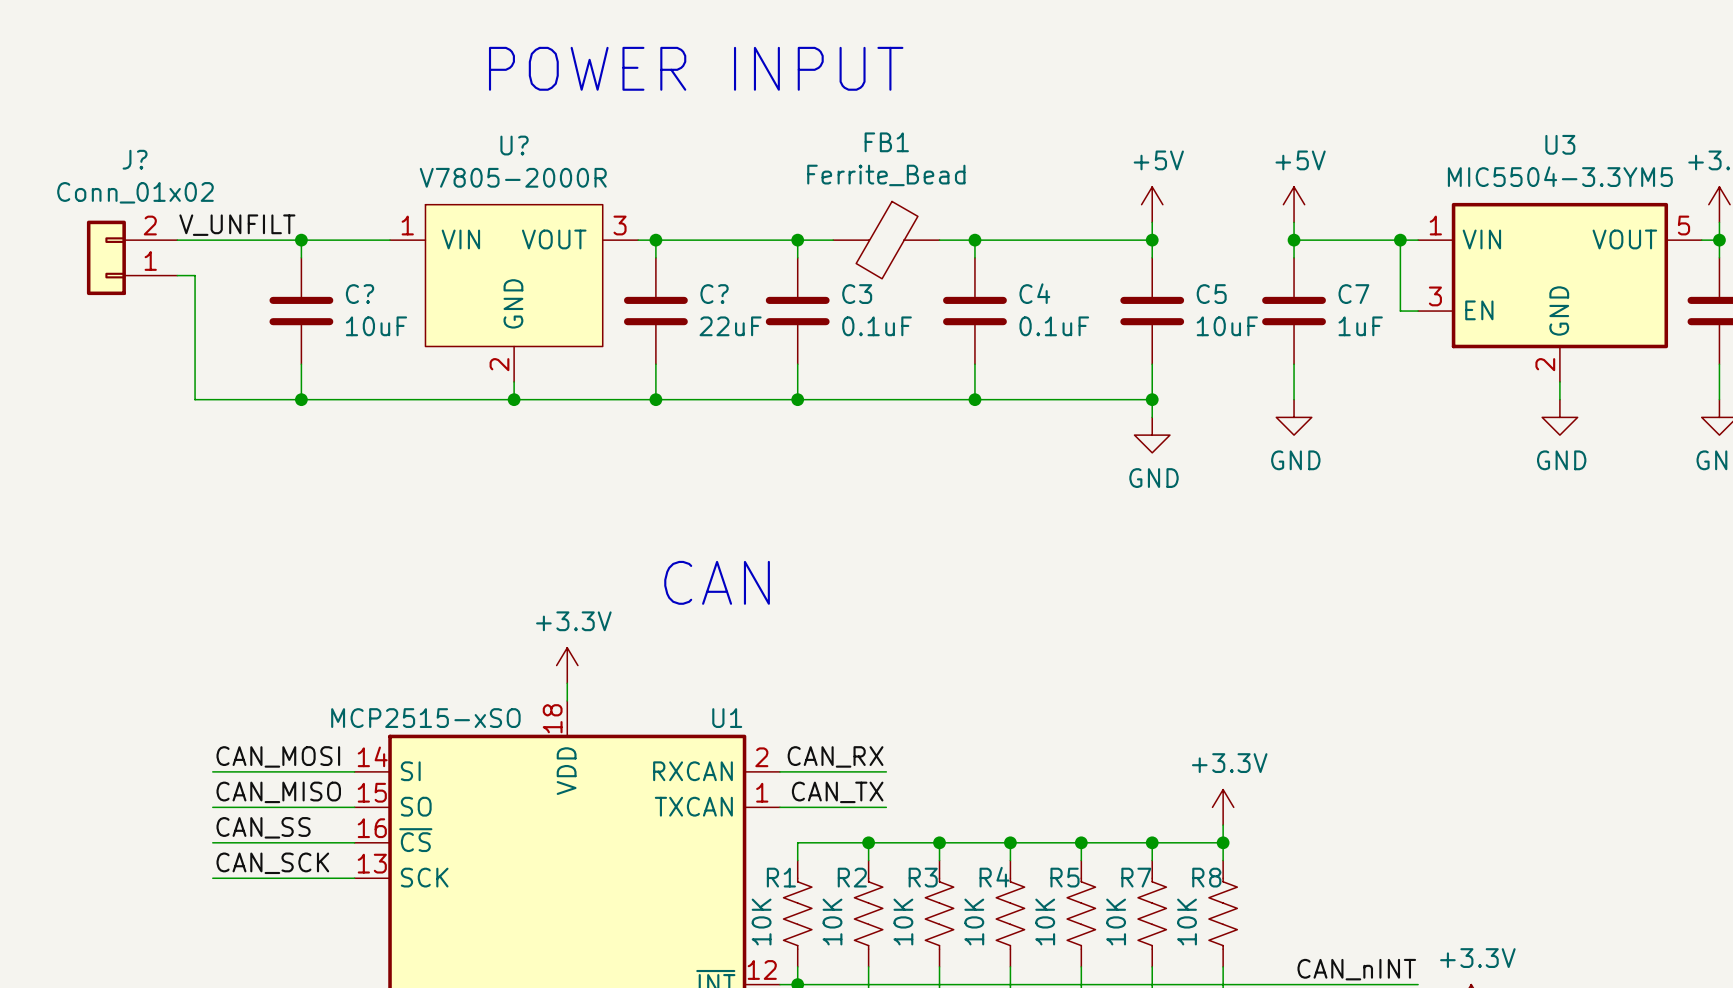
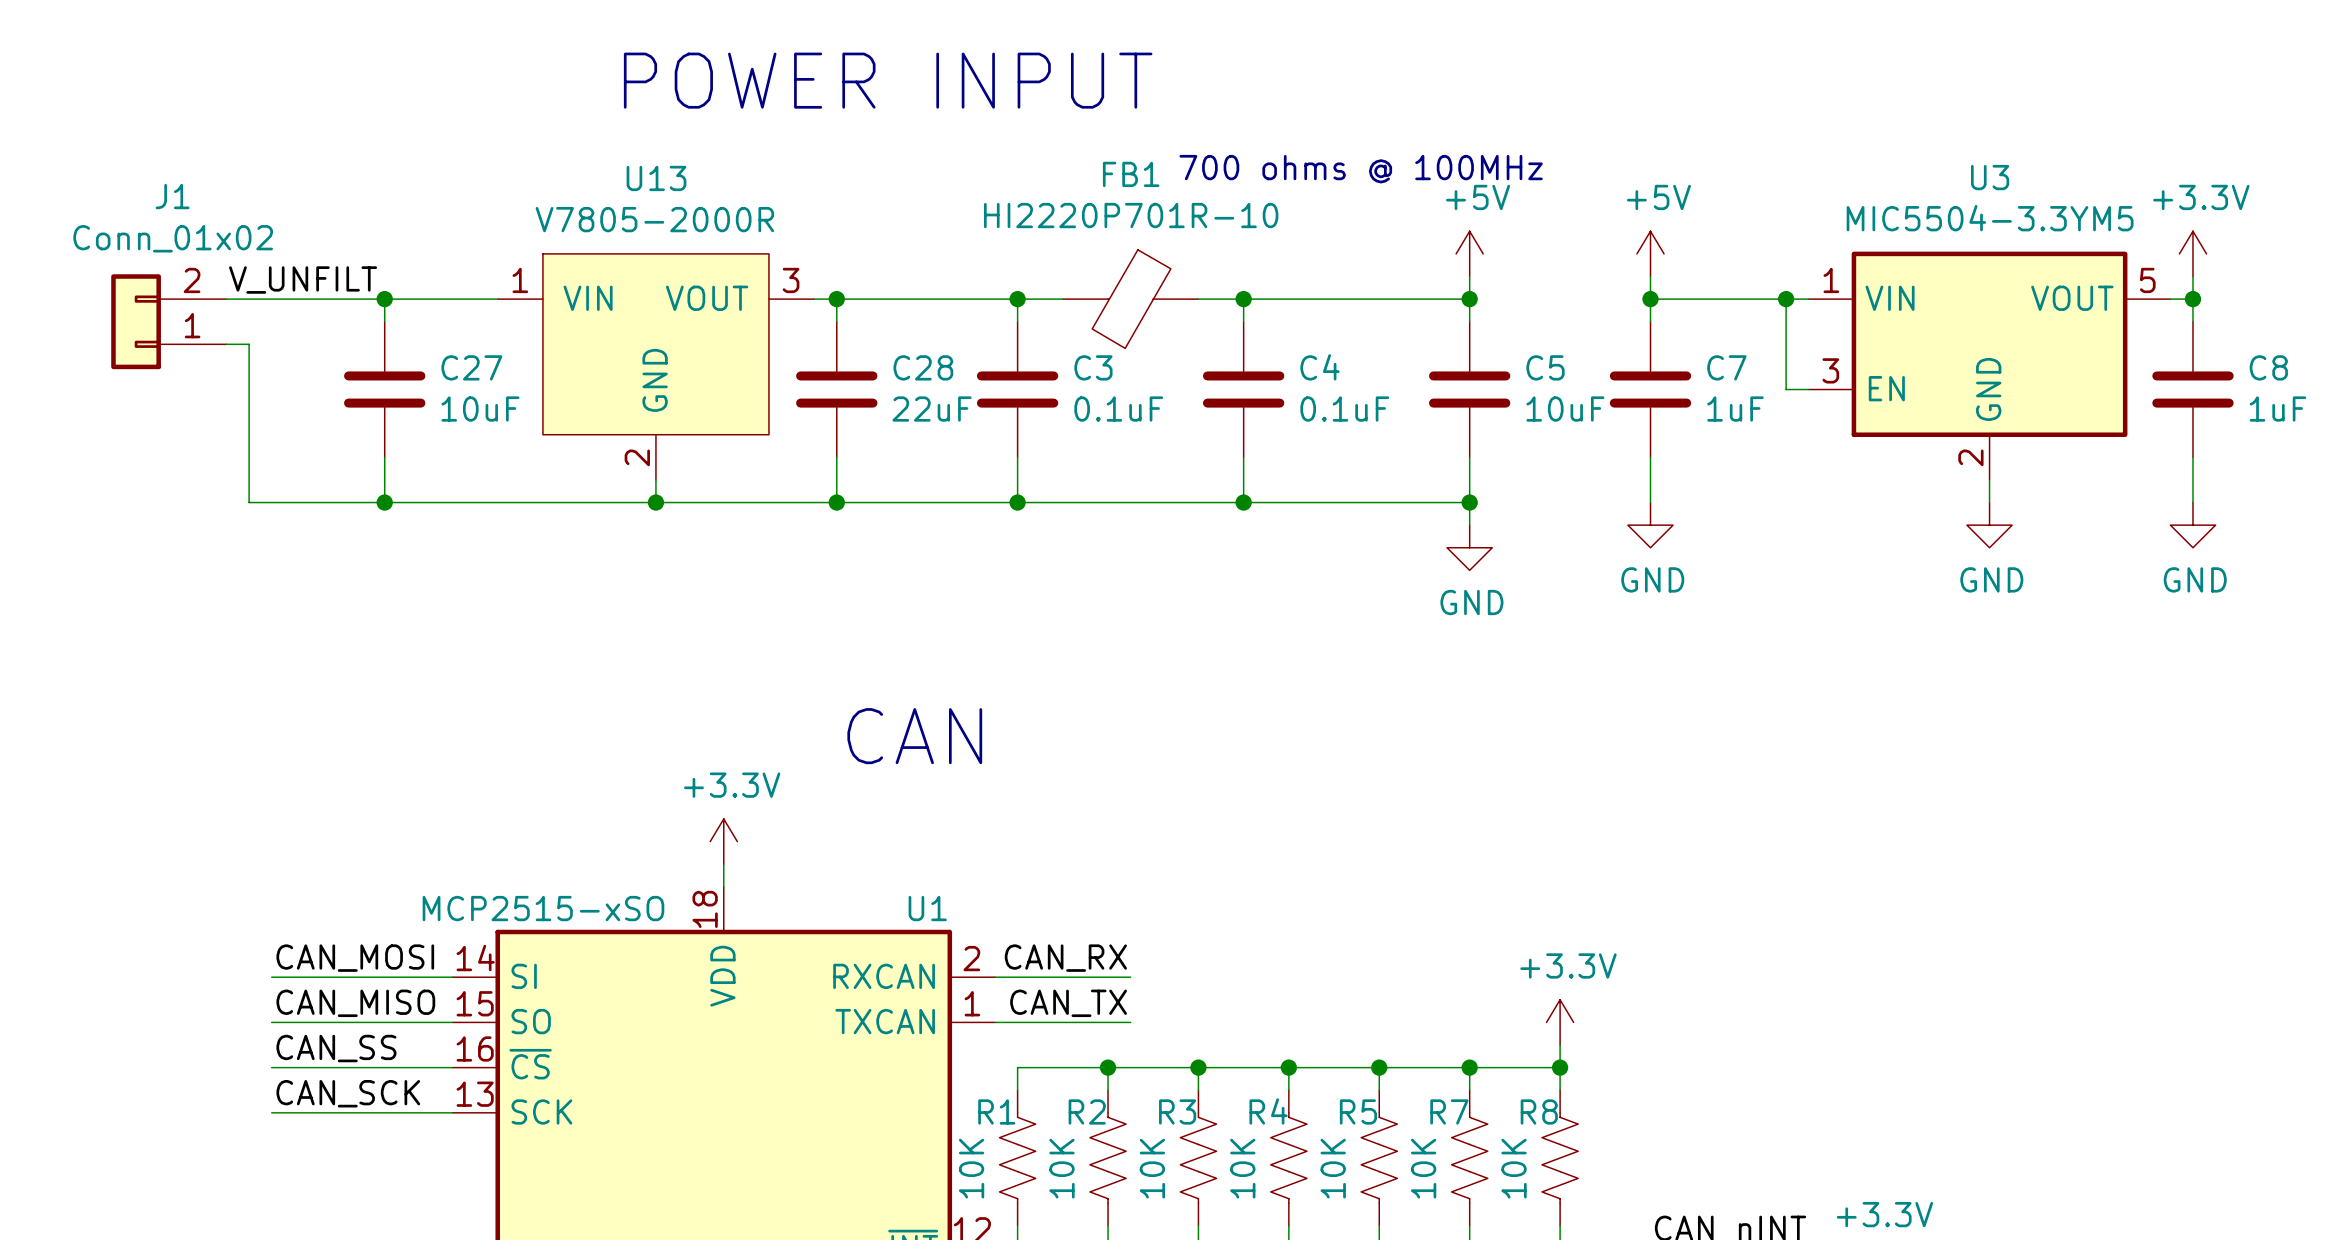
text: none -> 700 ohms @ 100MHz (1361, 169)
U? name: U? (514, 145) -> U13 (656, 178)
J? name: J? (135, 159) -> J1 (172, 196)
FB1 value: Ferrite_Bead (886, 175) -> HI2220P701R-10 (1131, 215)
C? name: C? (360, 294) -> C27 (471, 367)
C? name: C? (714, 294) -> C28 (923, 367)

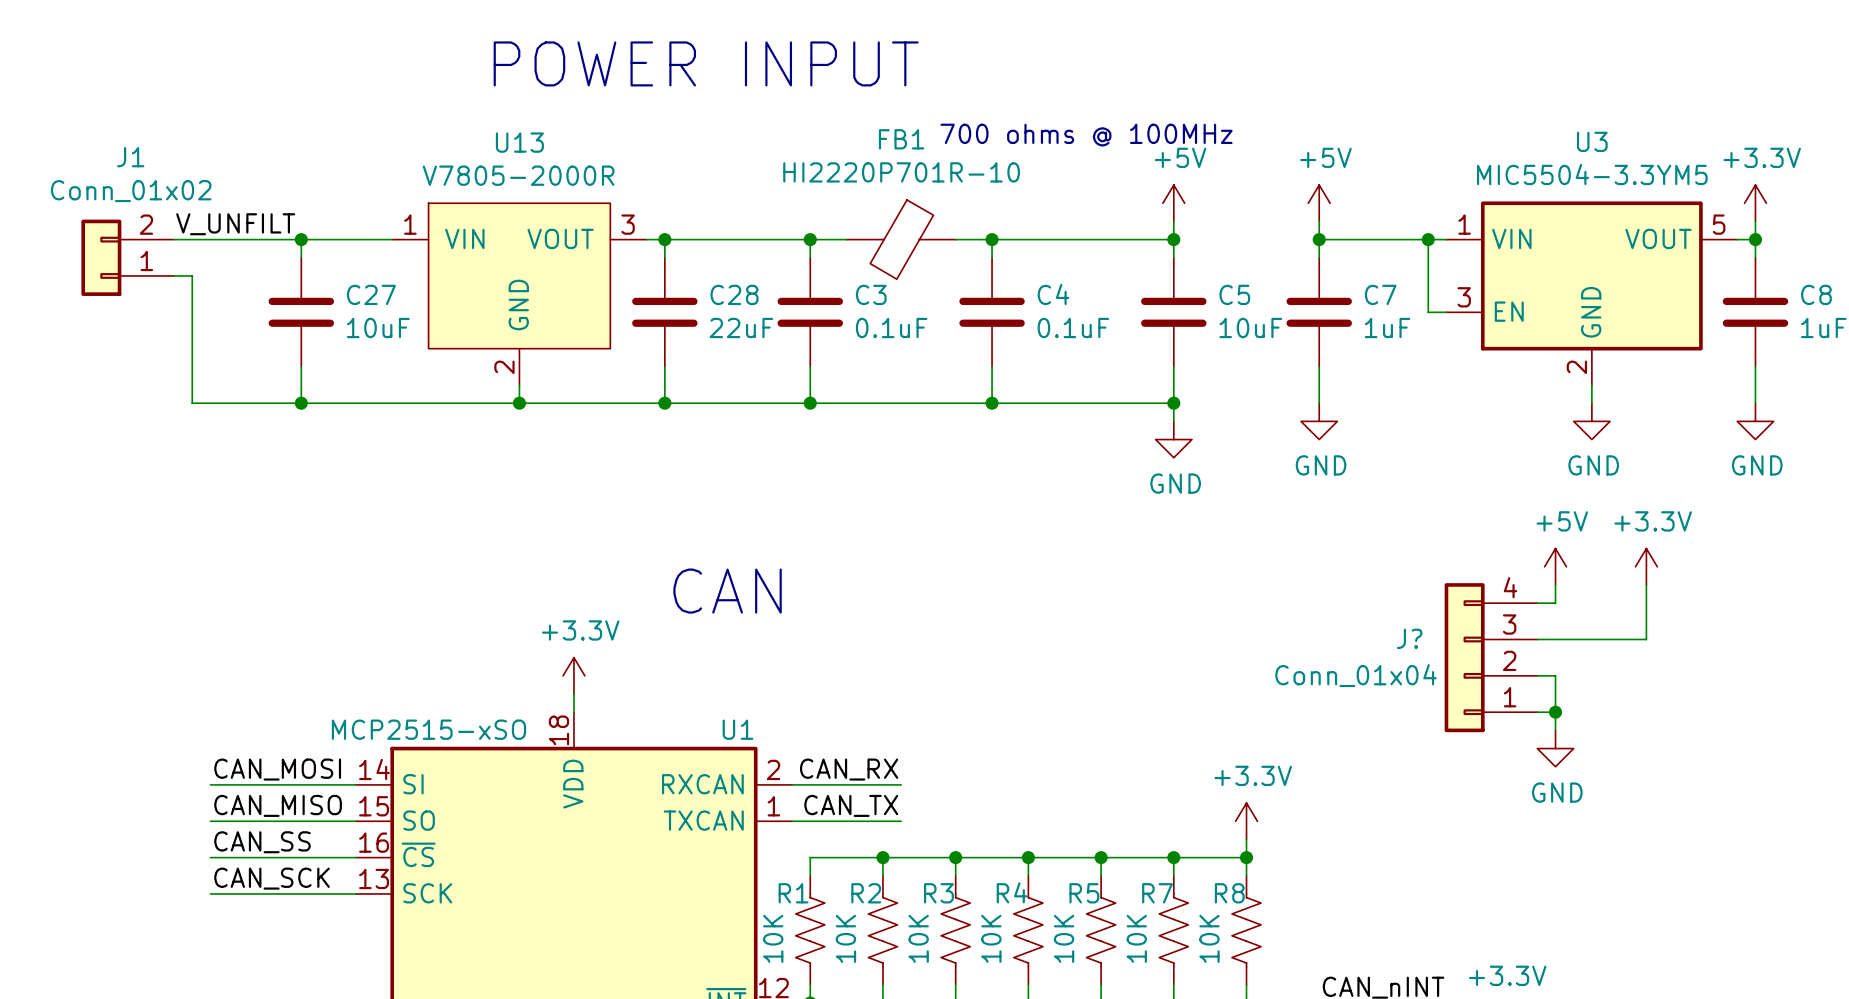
power symbol: none -> +5V (1555, 566)
power symbol: none -> +3.3V (1646, 566)
wire: none -> (1555, 584) (1555, 603) (1537, 603)
wire: none -> (1646, 584) (1646, 639) (1537, 639)
J?: none -> Conn_01x04 (1490, 657)
wire: none -> (1537, 675) (1555, 675) (1555, 730)
wire: none -> (1537, 712) (1555, 712)
junction: none -> (1555, 712)
power symbol: none -> GND (1555, 748)

